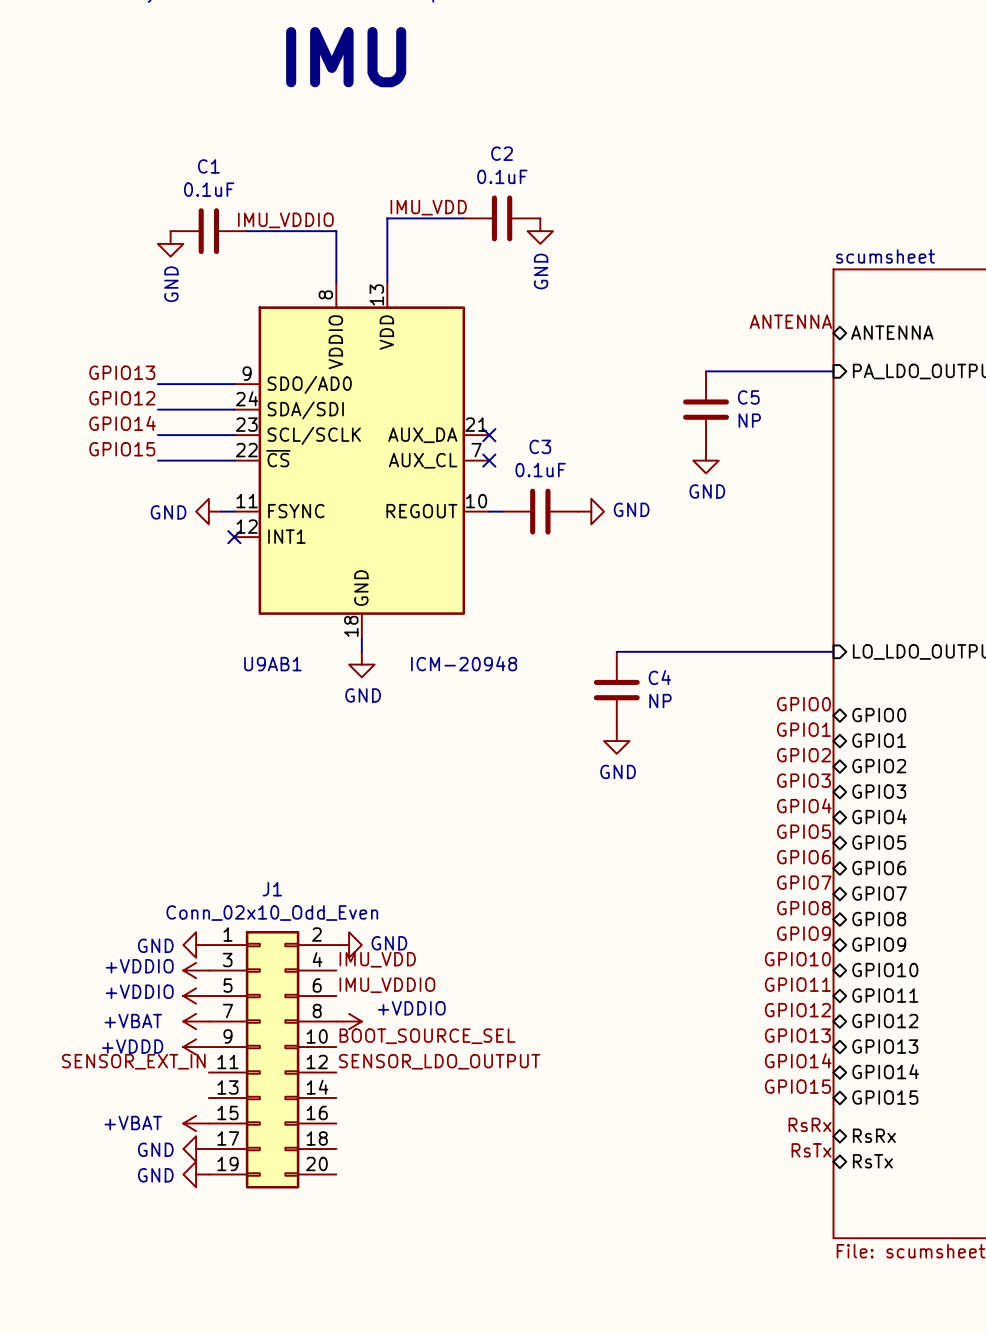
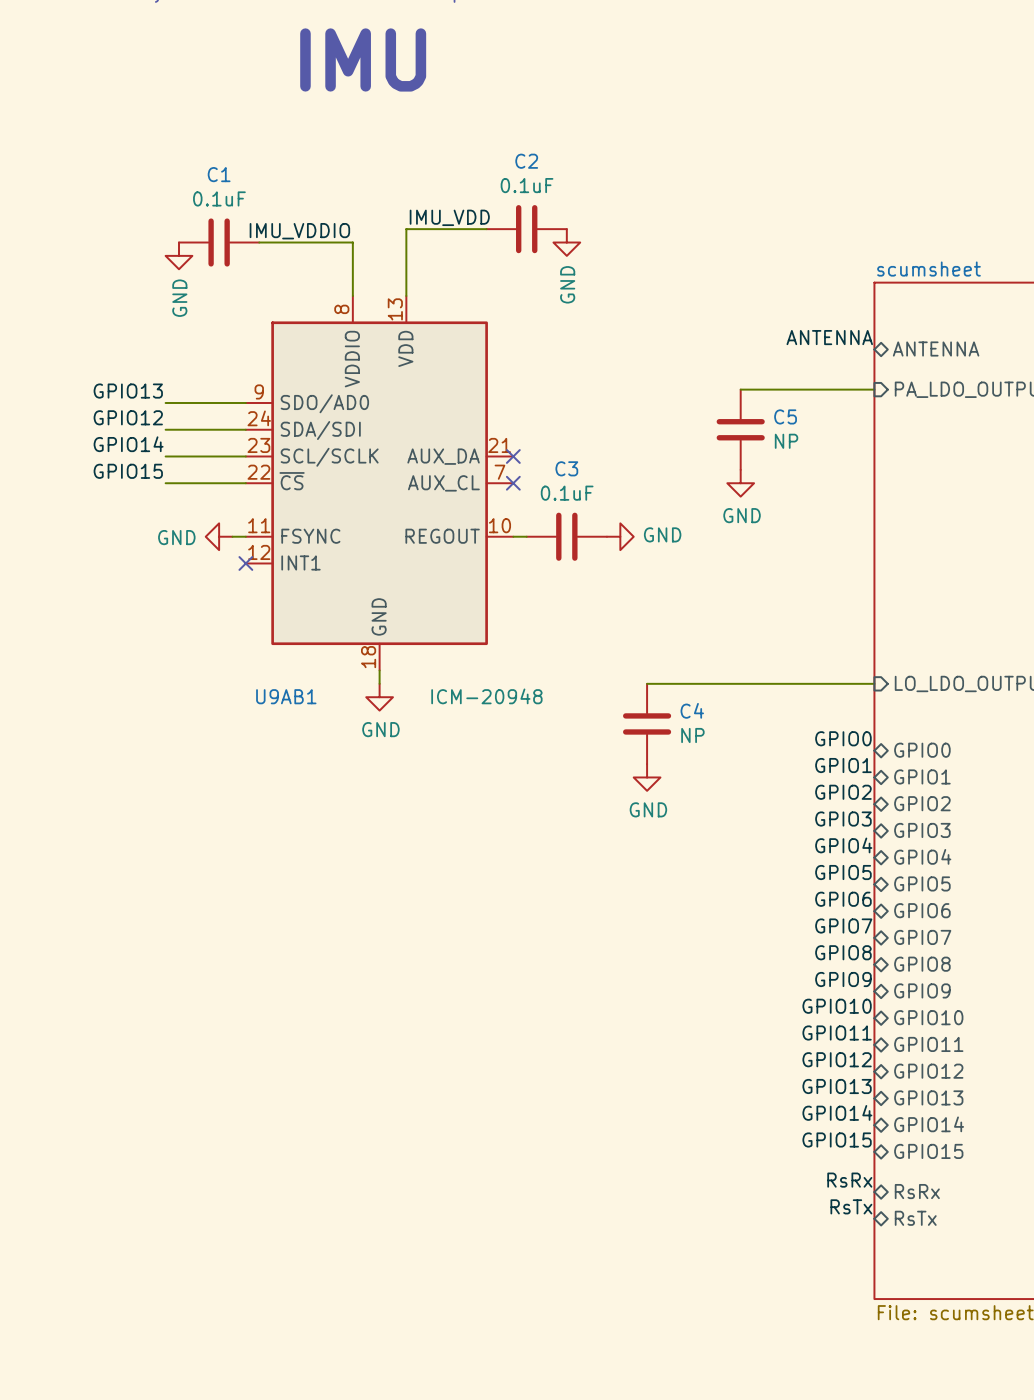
power symbol: GND (196, 945) -> none
power symbol: GND (349, 945) -> none
label: IMU_VDD (377, 959) -> none
power symbol: +VDDIO (196, 970) -> none
label: IMU_VDDIO (387, 985) -> none
power symbol: +VDDIO (196, 996) -> none
power symbol: +VBAT (196, 1021) -> none
power symbol: +VDDIO (349, 1021) -> none
label: BOOT_SOURCE_SEL (427, 1036) -> none
power symbol: +VDDD (196, 1047) -> none
J1: Conn_02x10_Odd_Even (272, 1059) -> none
label: SENSOR_EXT_IN (133, 1061) -> none
label: SENSOR_LDO_OUTPUT (439, 1061) -> none
power symbol: +VBAT (196, 1123) -> none
power symbol: GND (196, 1149) -> none
power symbol: GND (196, 1174) -> none

